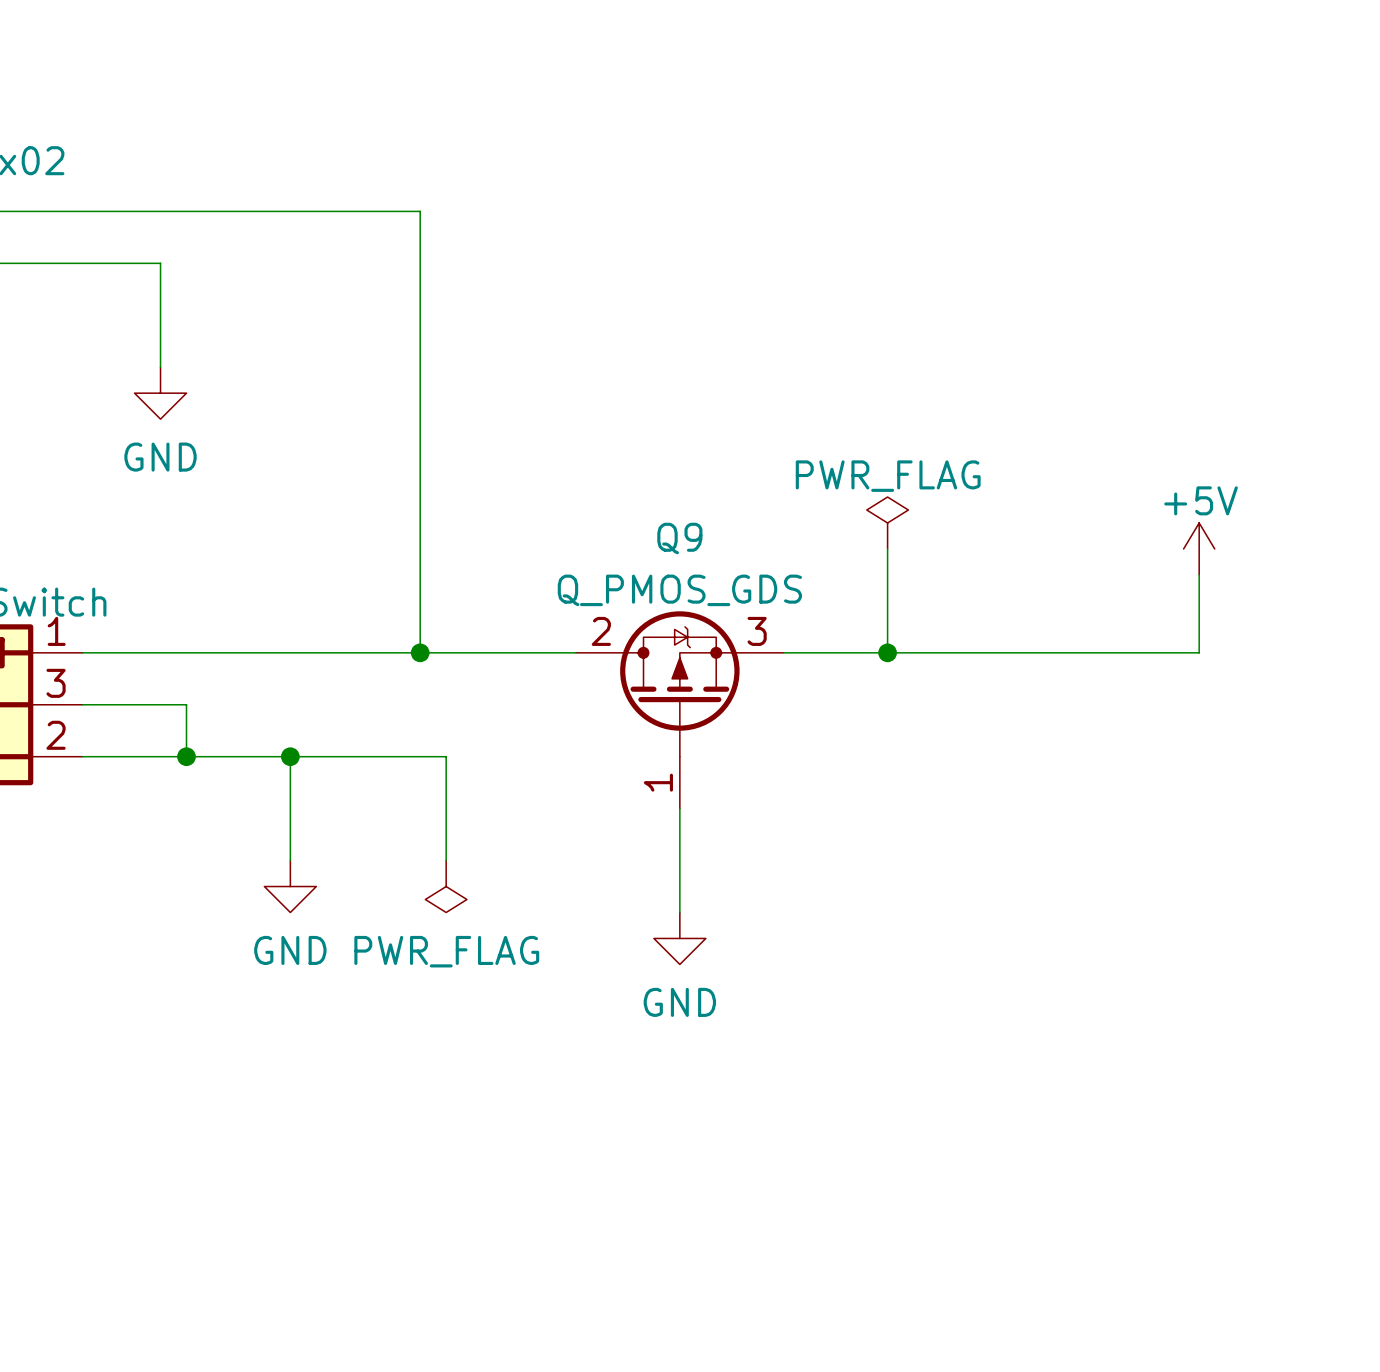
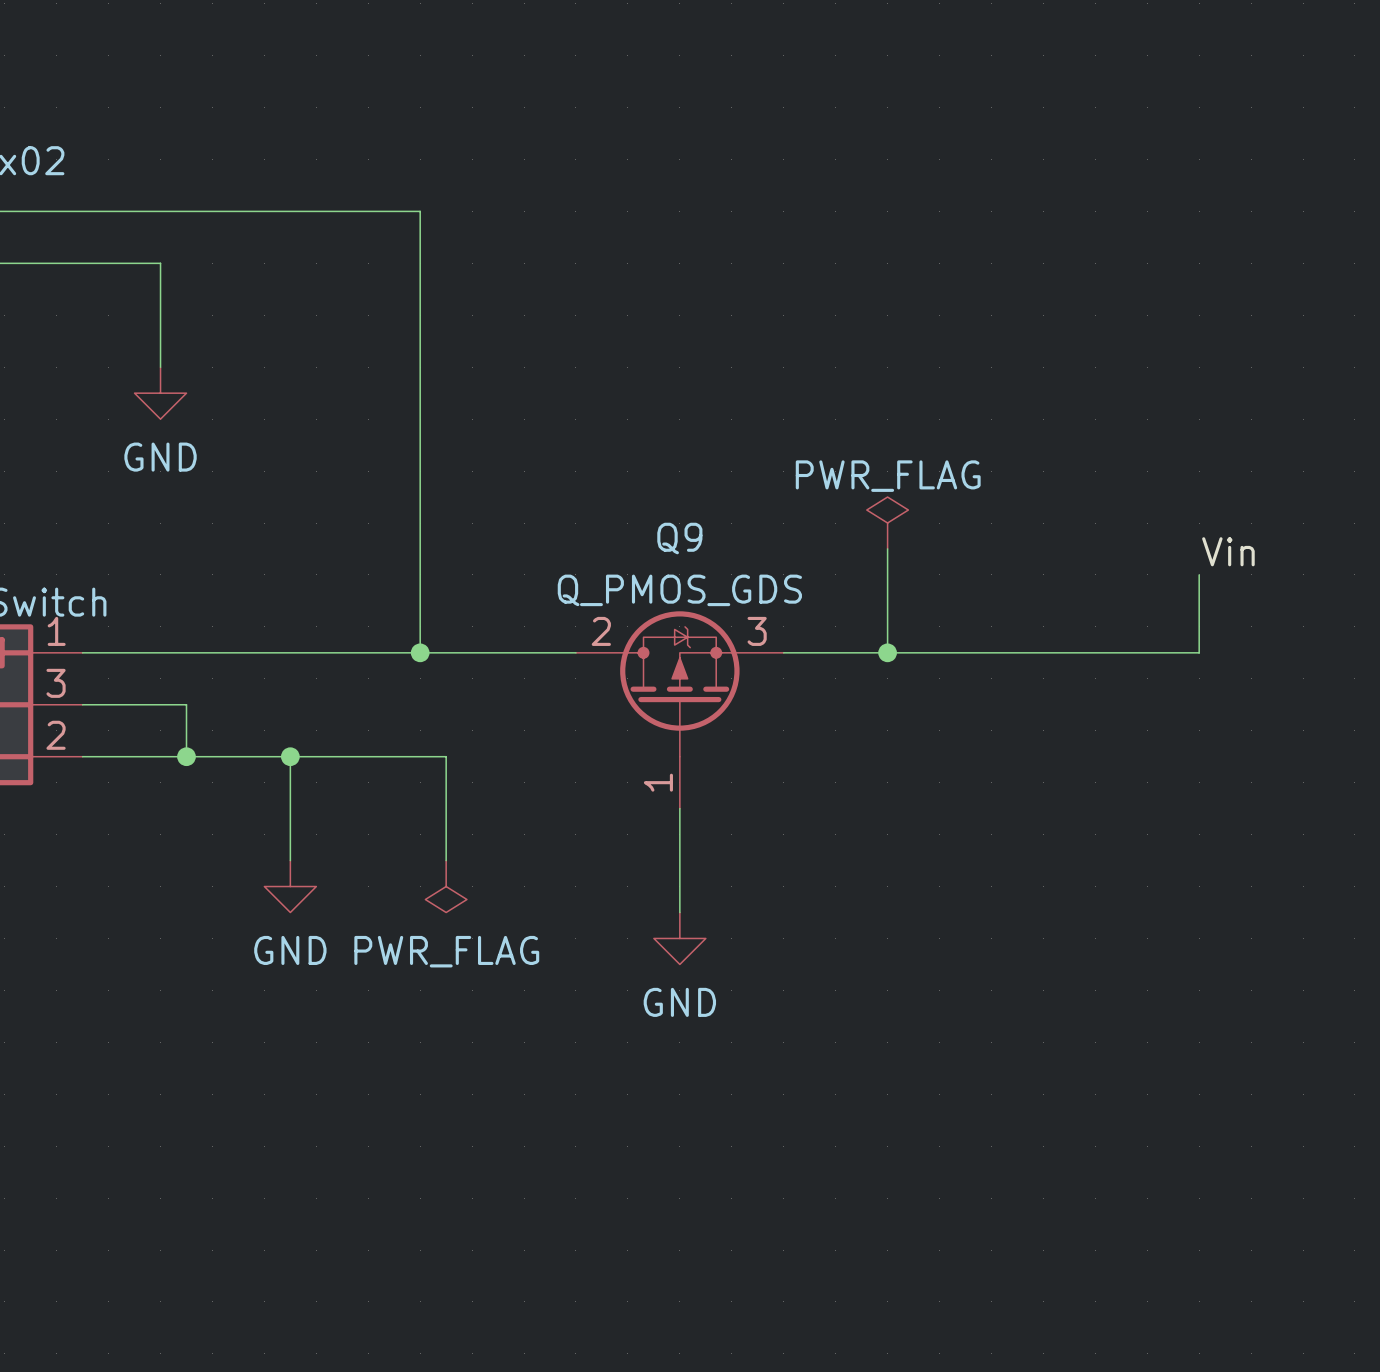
power symbol: +5V (1199, 548) -> none
label: none -> Vin (1228, 551)

